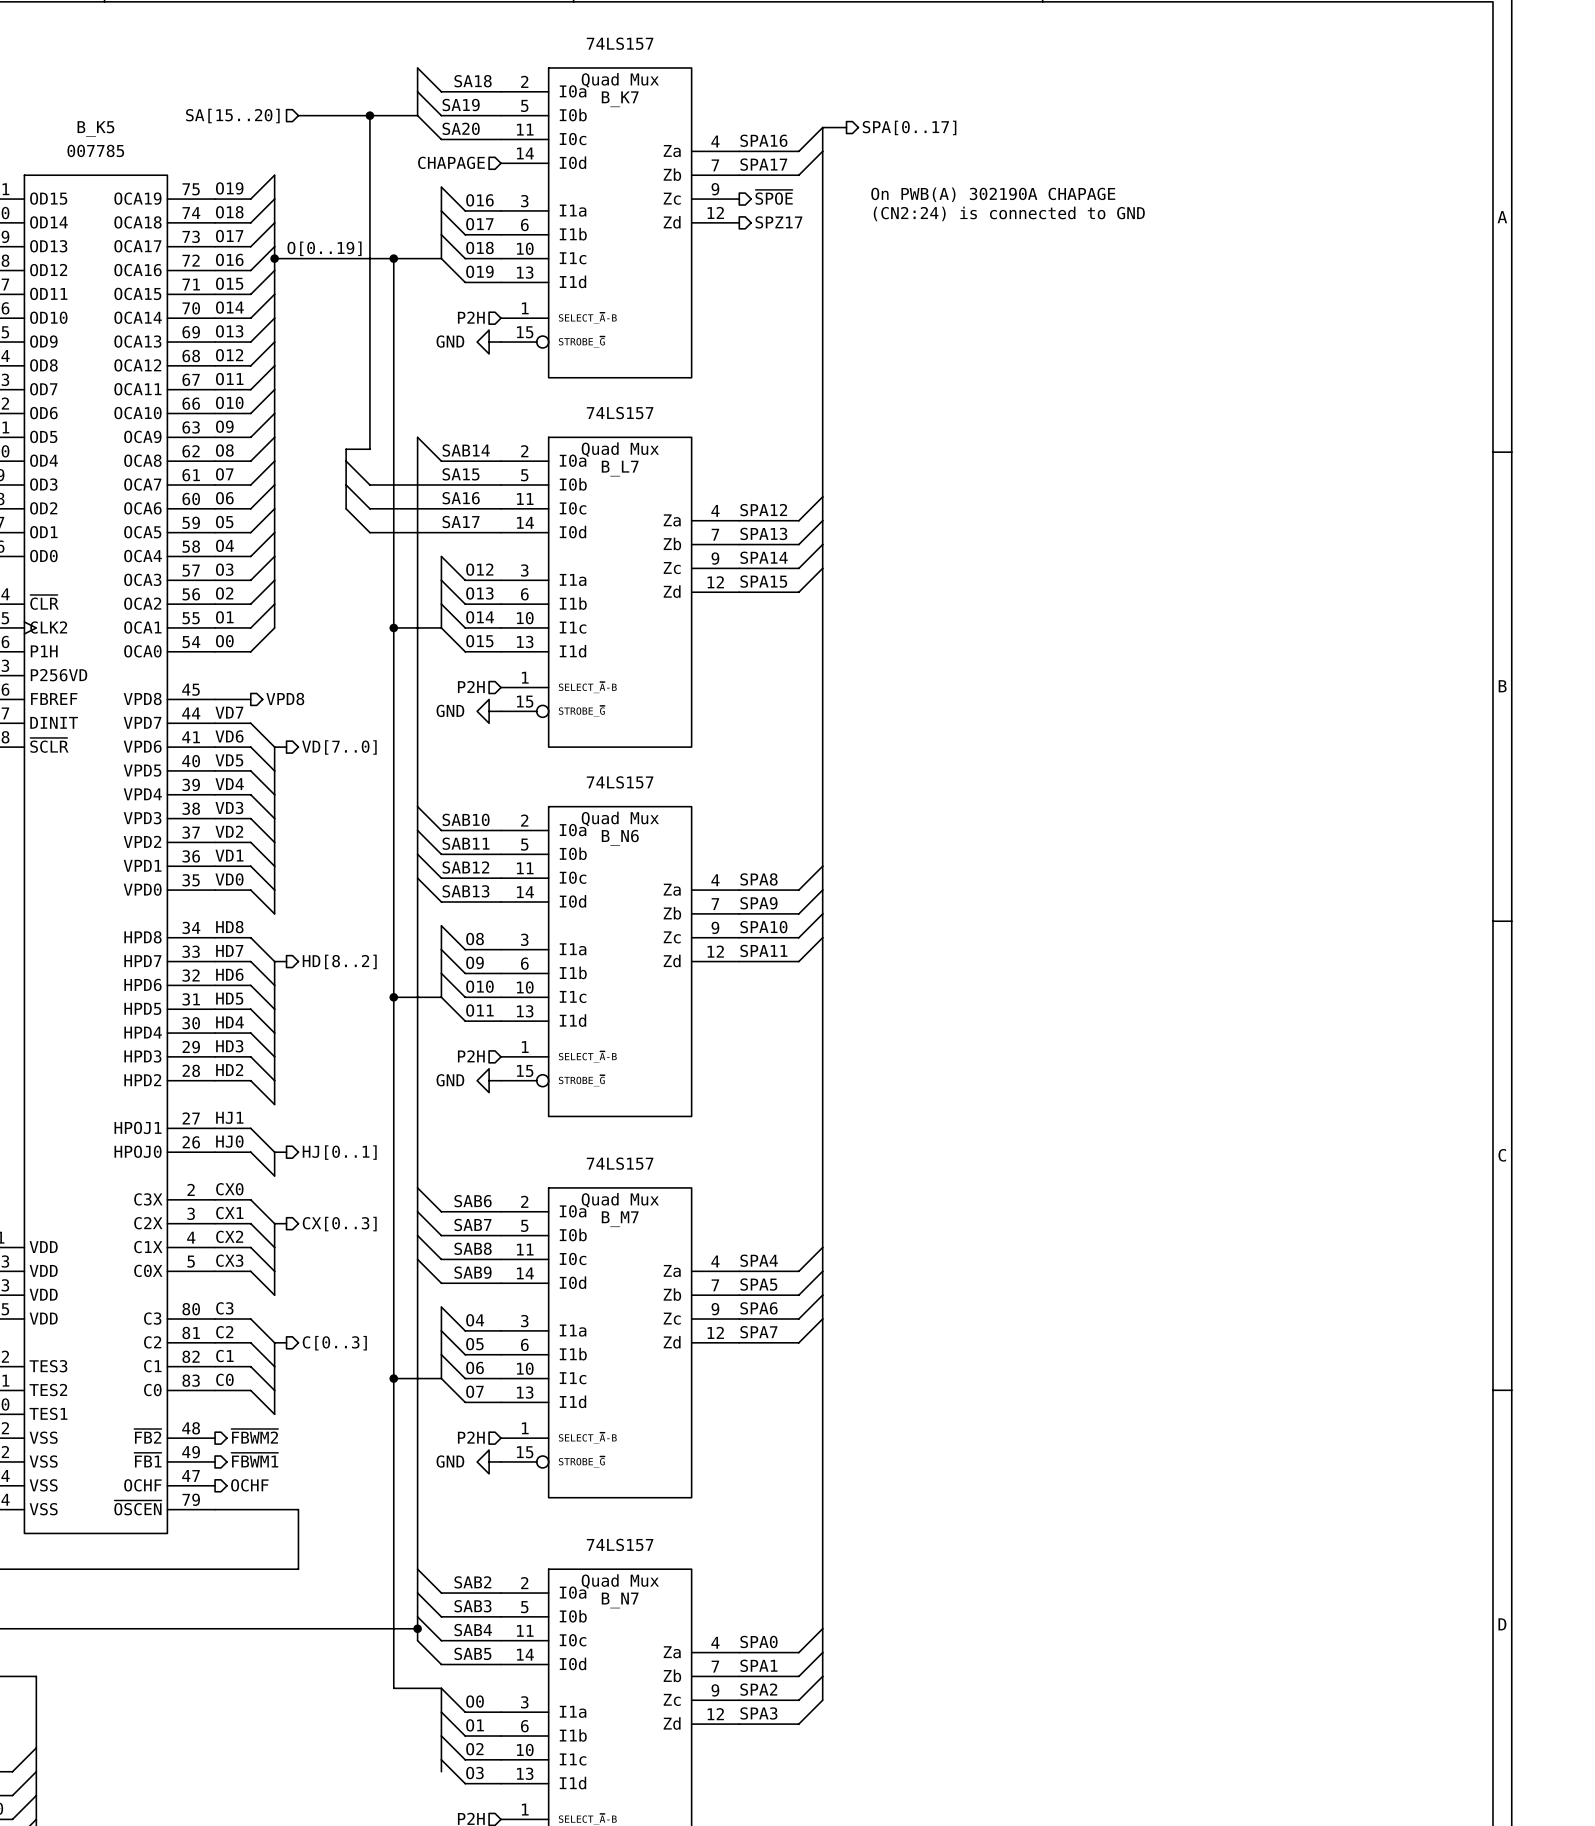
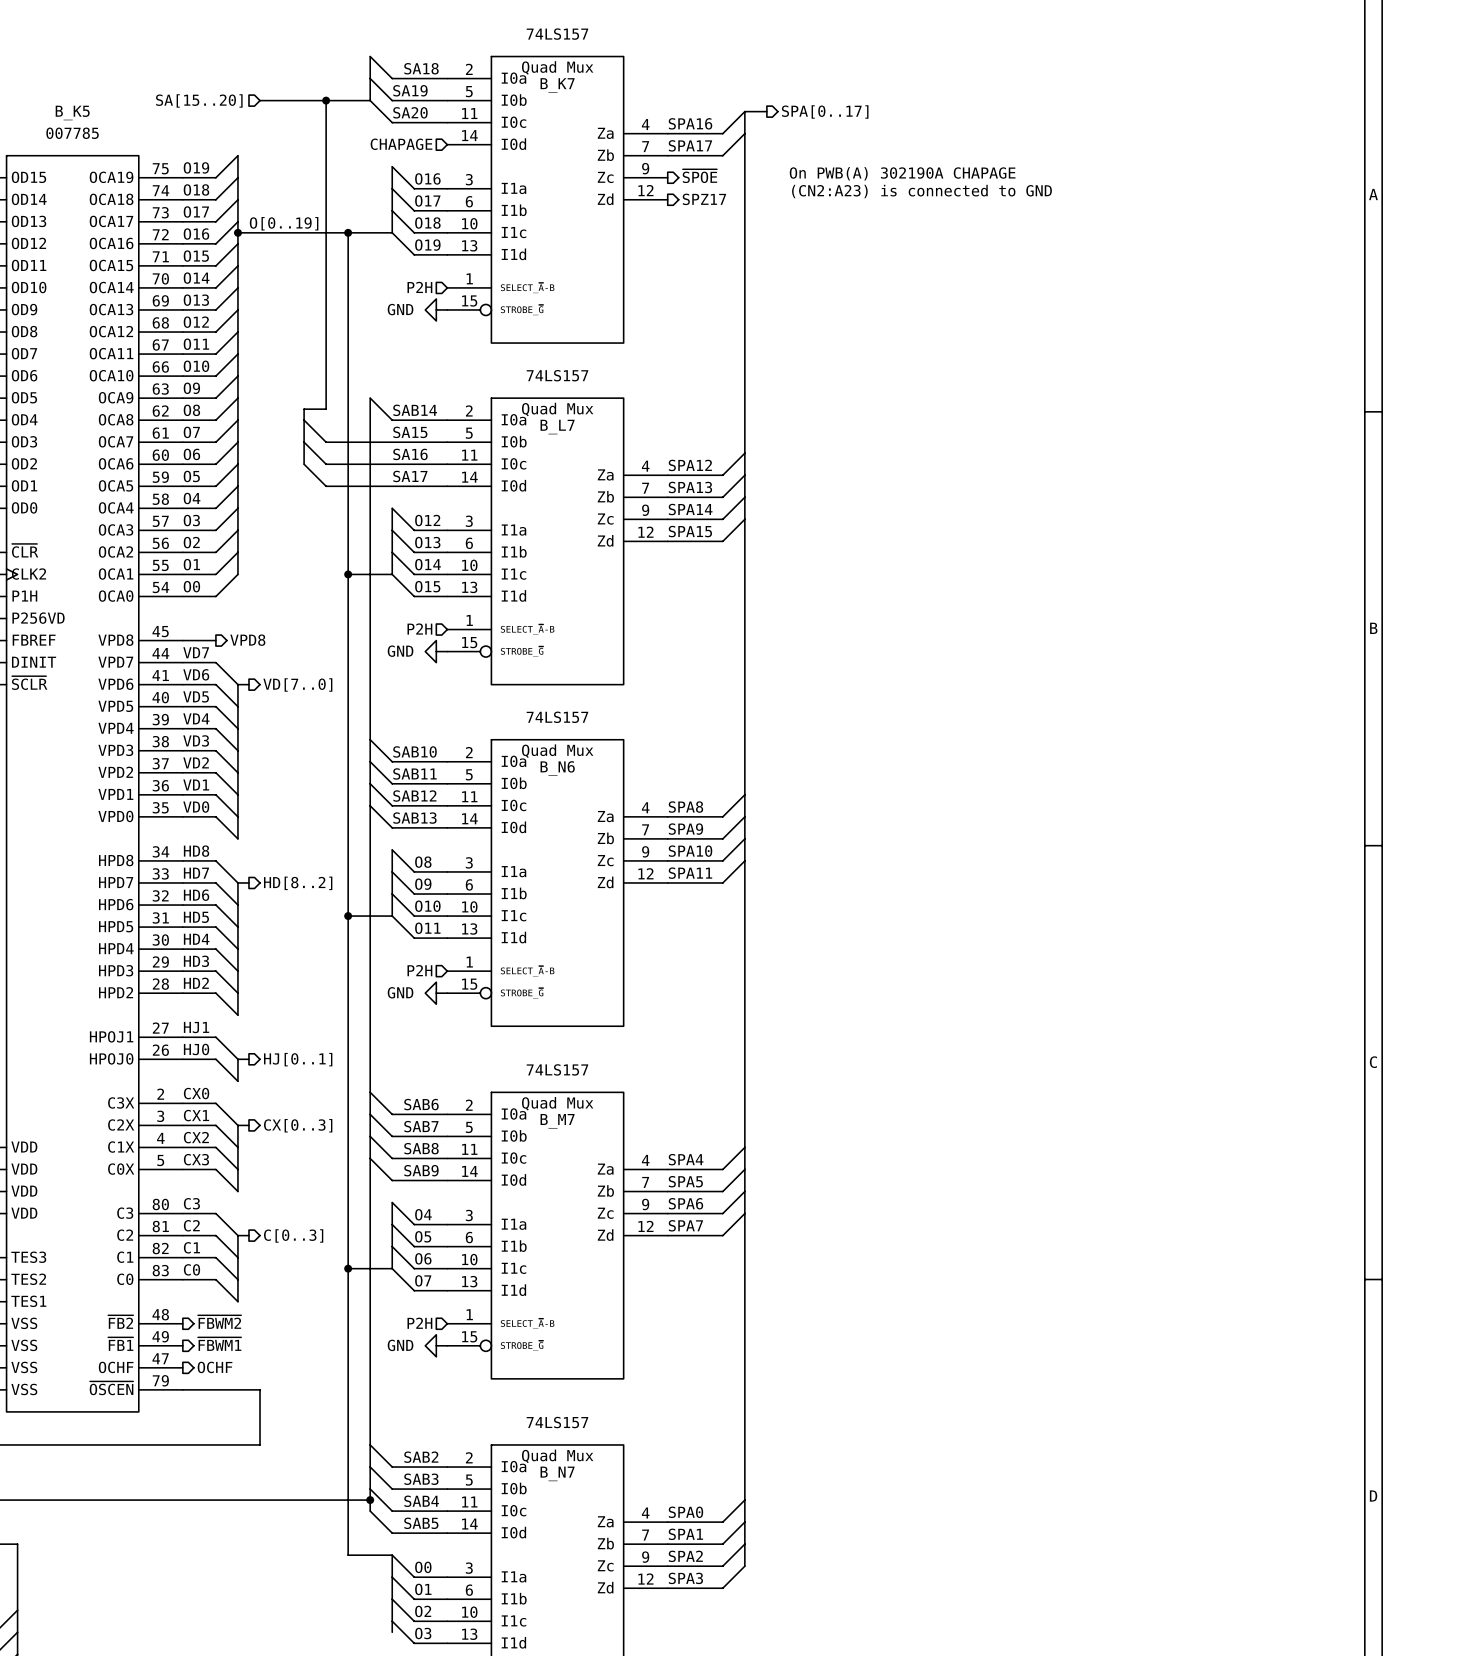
text: (CN2:24) is connected to GND (1009, 213) -> (CN2:A23) is connected to GND (921, 191)

